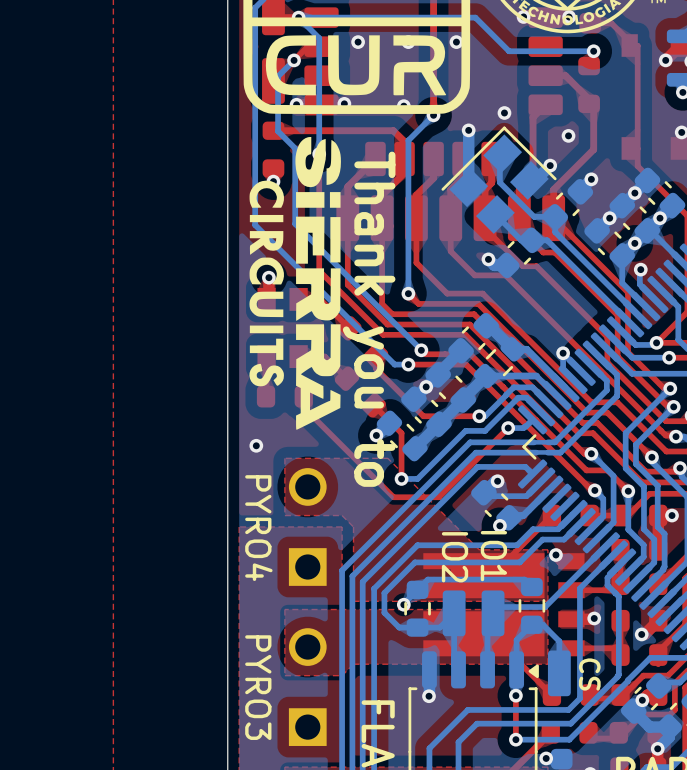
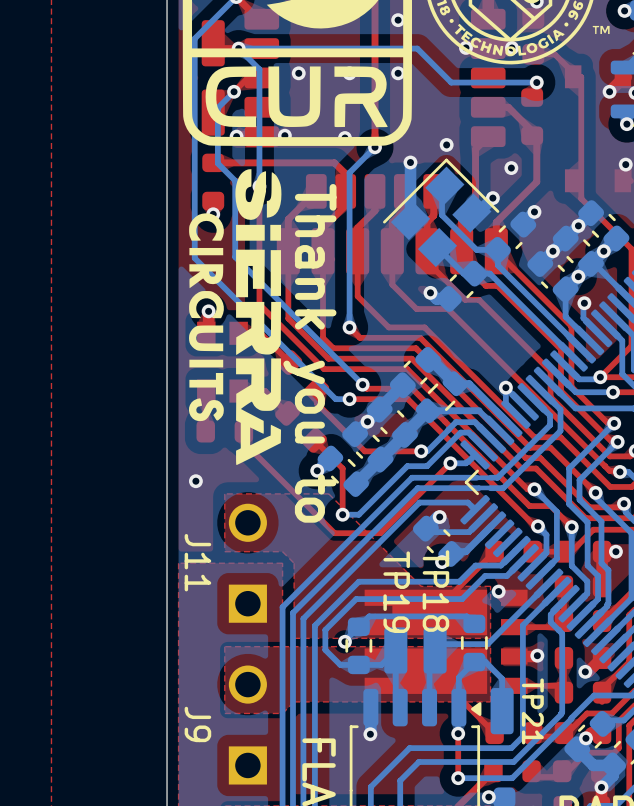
PYRO4 name: PYRO4 (258, 528) -> J11 (197, 562)
IO1 name: IO1 (493, 556) -> TP18 (435, 591)
IO2 name: IO2 (455, 557) -> TP19 (396, 592)
CS name: CS (589, 674) -> TP21 (532, 711)
PYRO3 name: PYRO3 (258, 687) -> J9 (197, 724)

